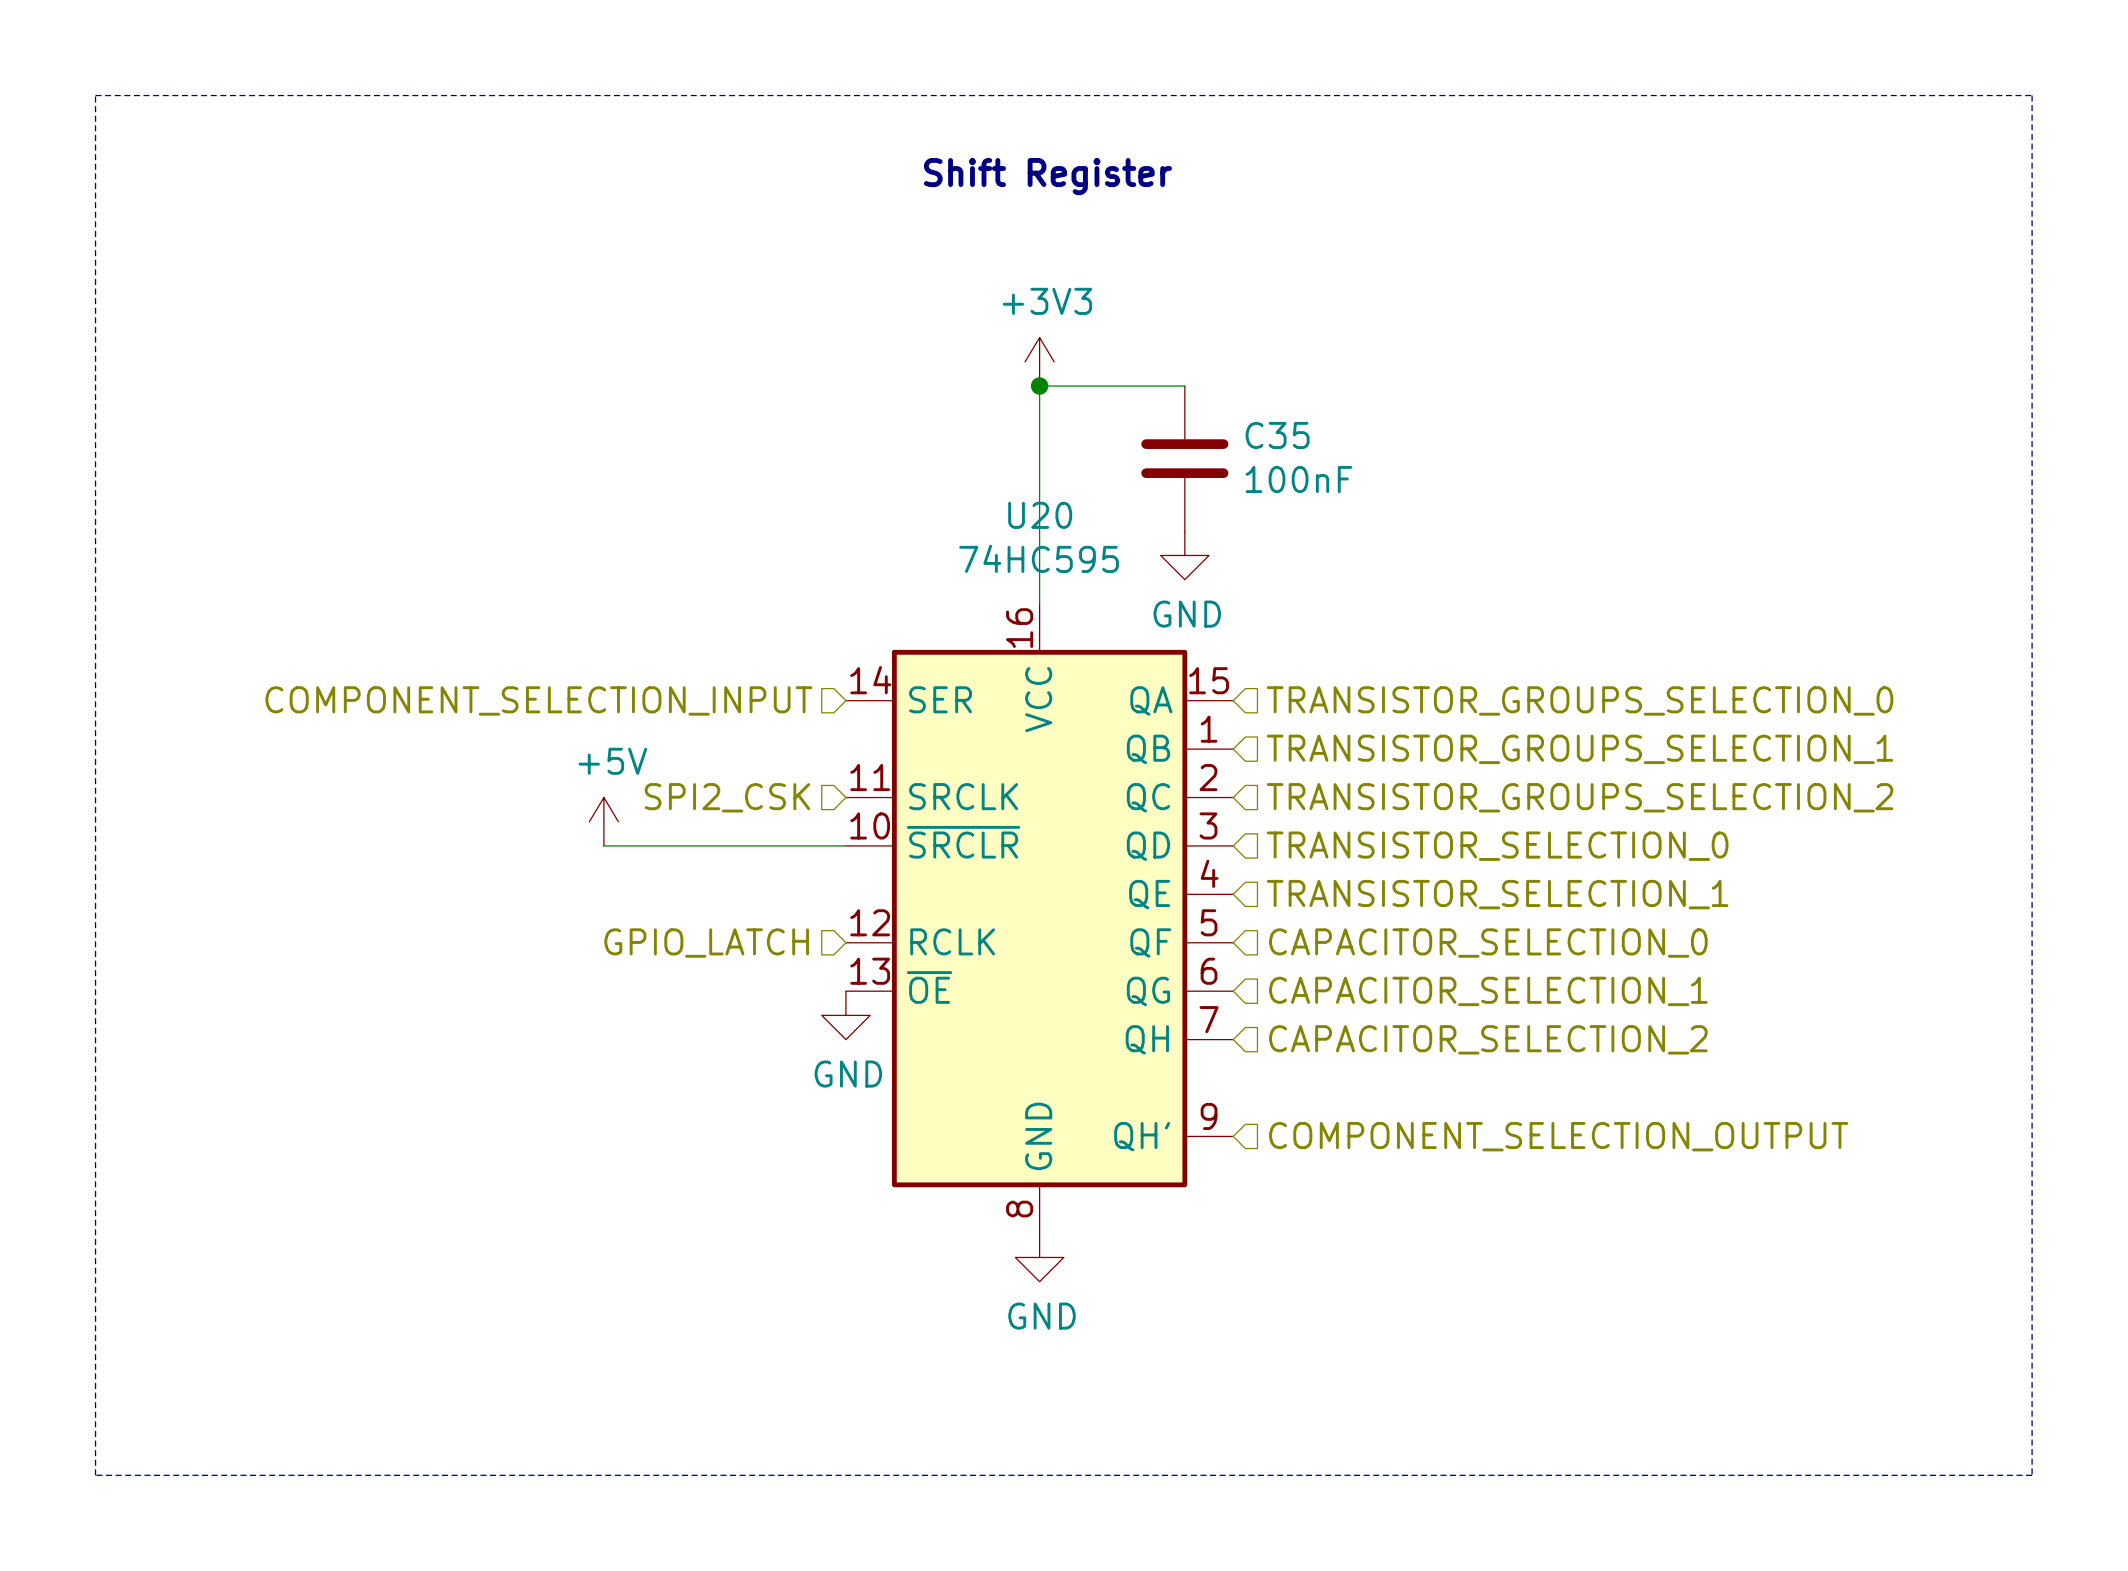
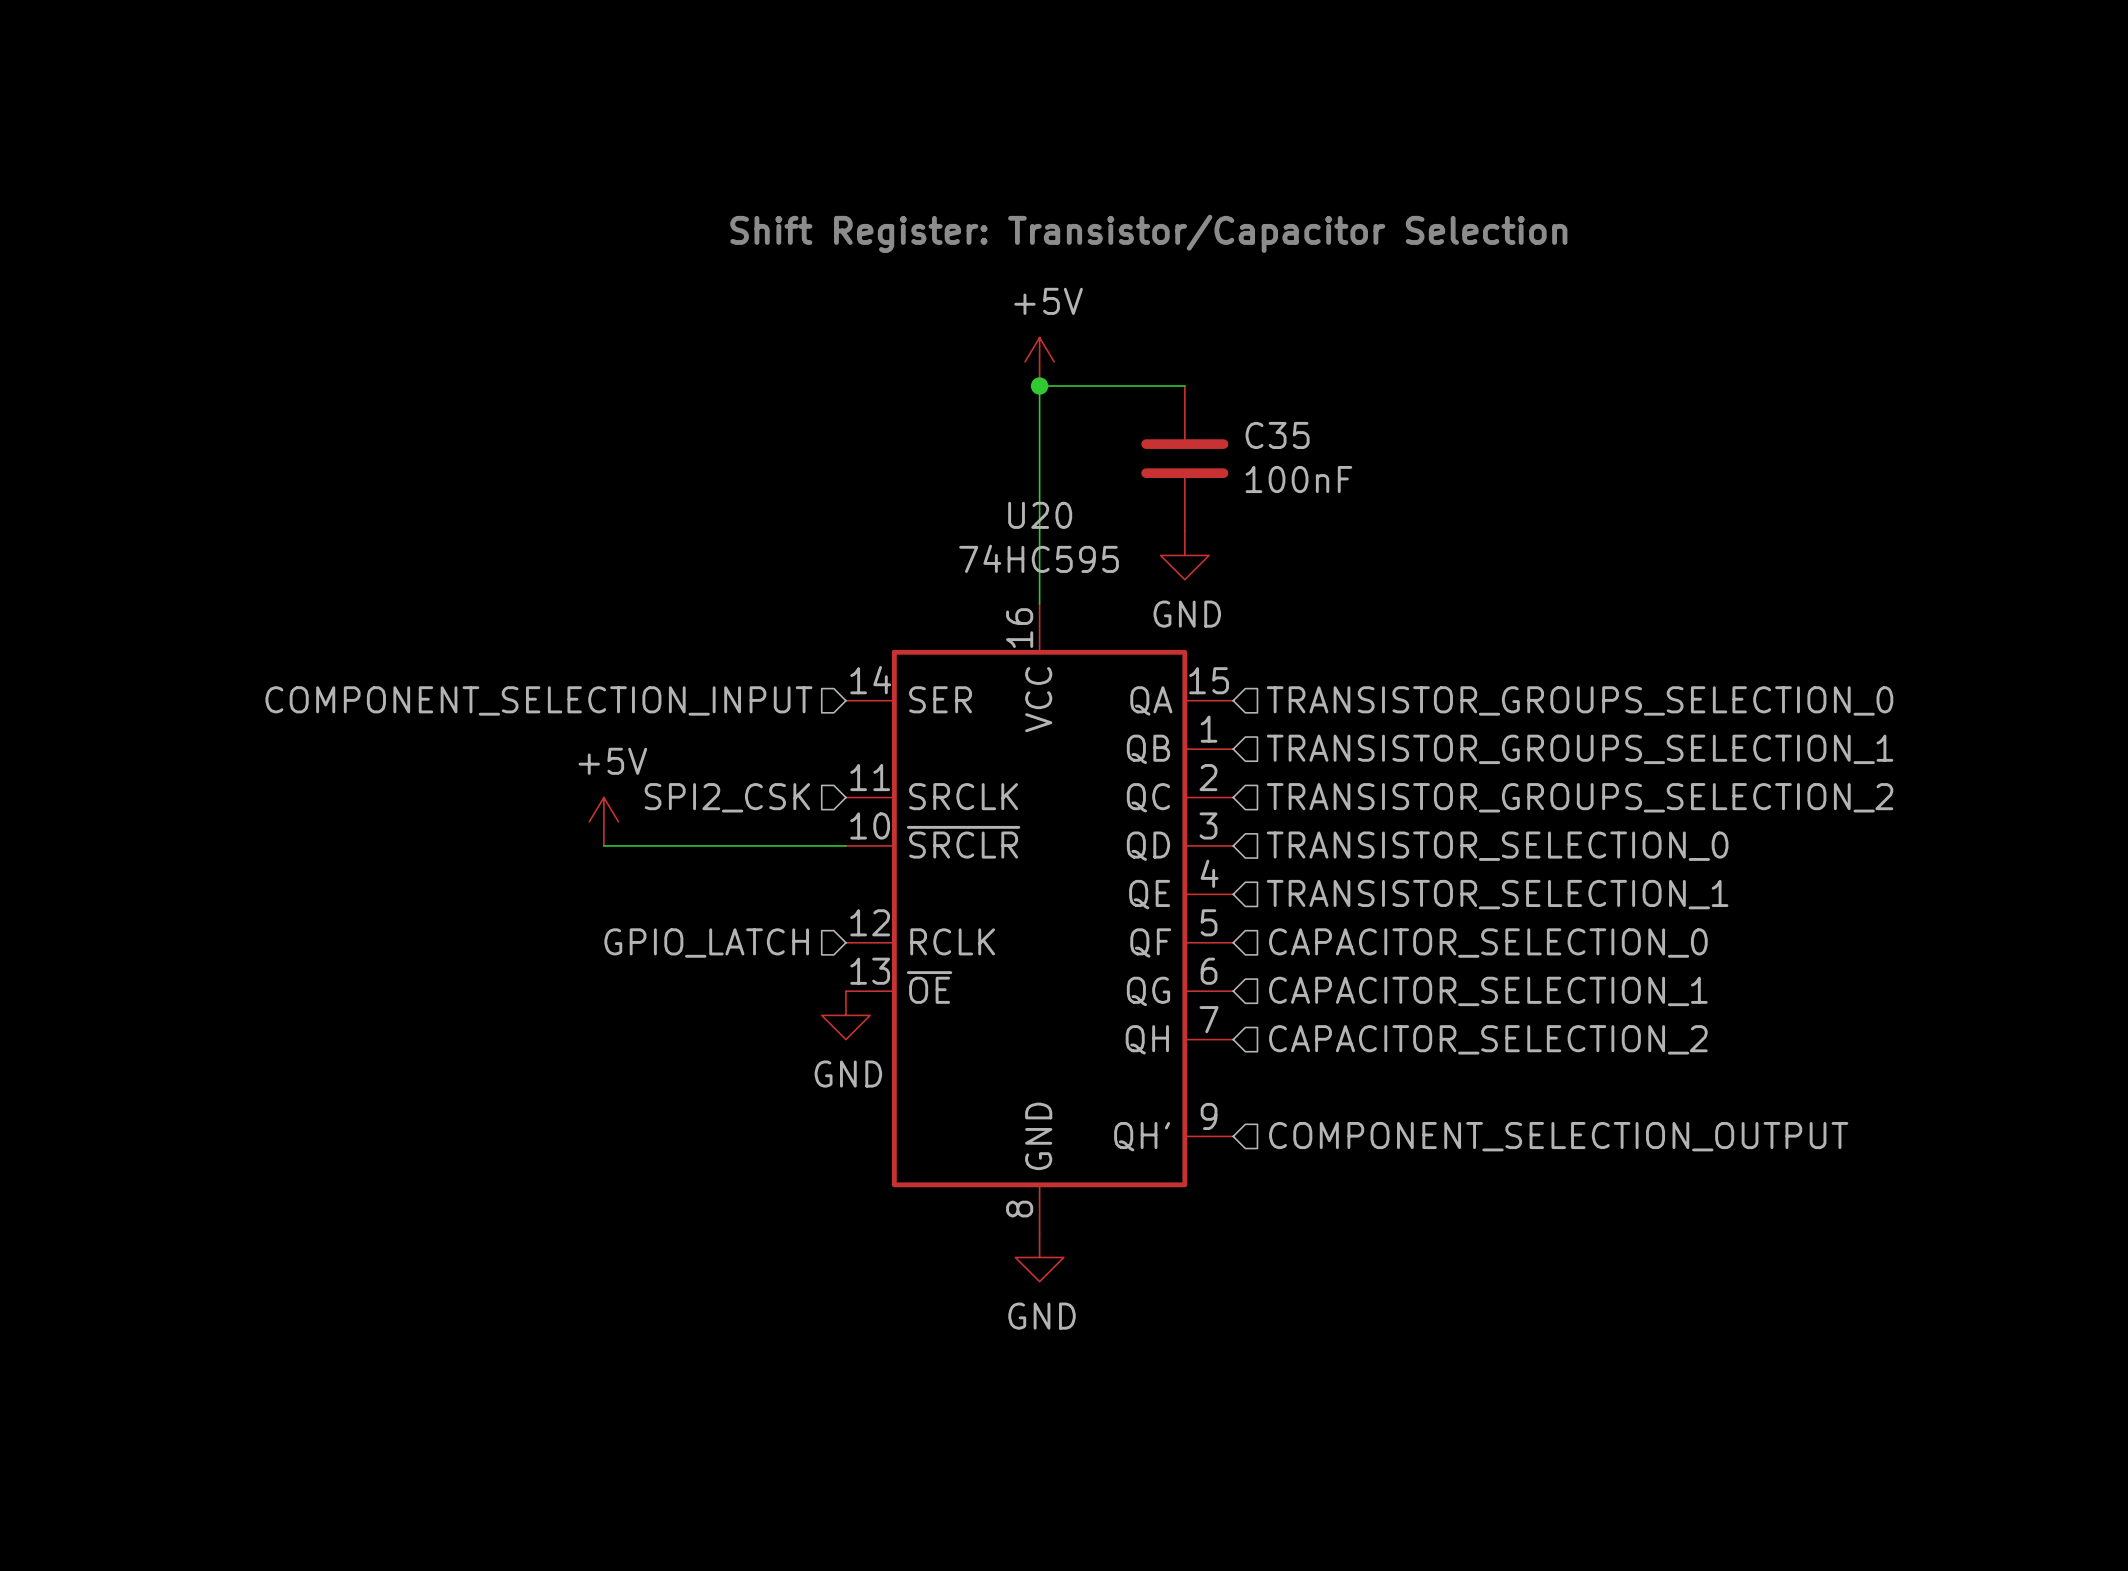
line: (95, 95) (95, 1475) (2032, 1475) (2032, 95) (95, 95) -> none
text: Shift Register (1047, 176) -> none
text: none -> Shift Register: Transistor/Capacitor Selection (1148, 233)
power symbol: +3V3 (1039, 361) -> +5V (1039, 361)

